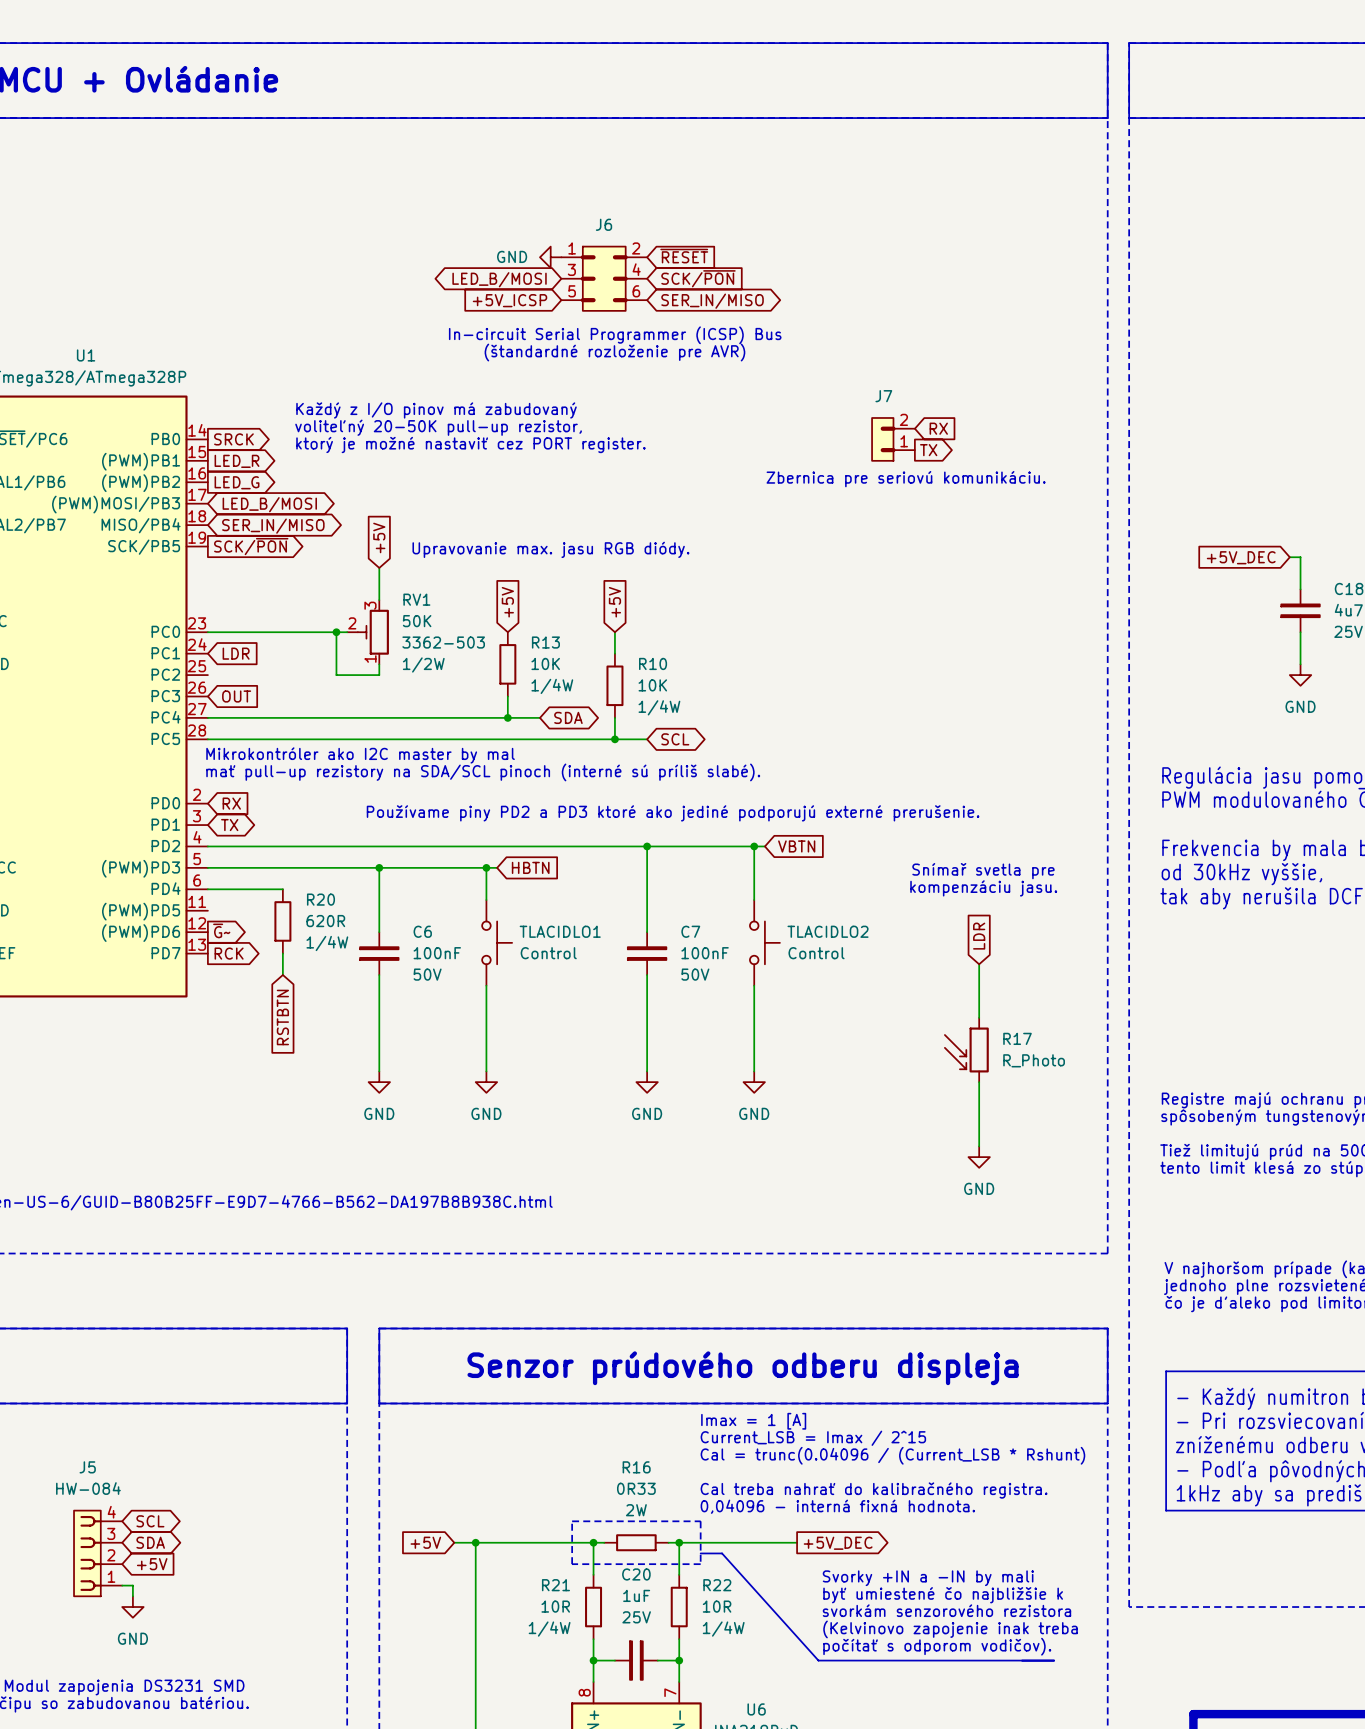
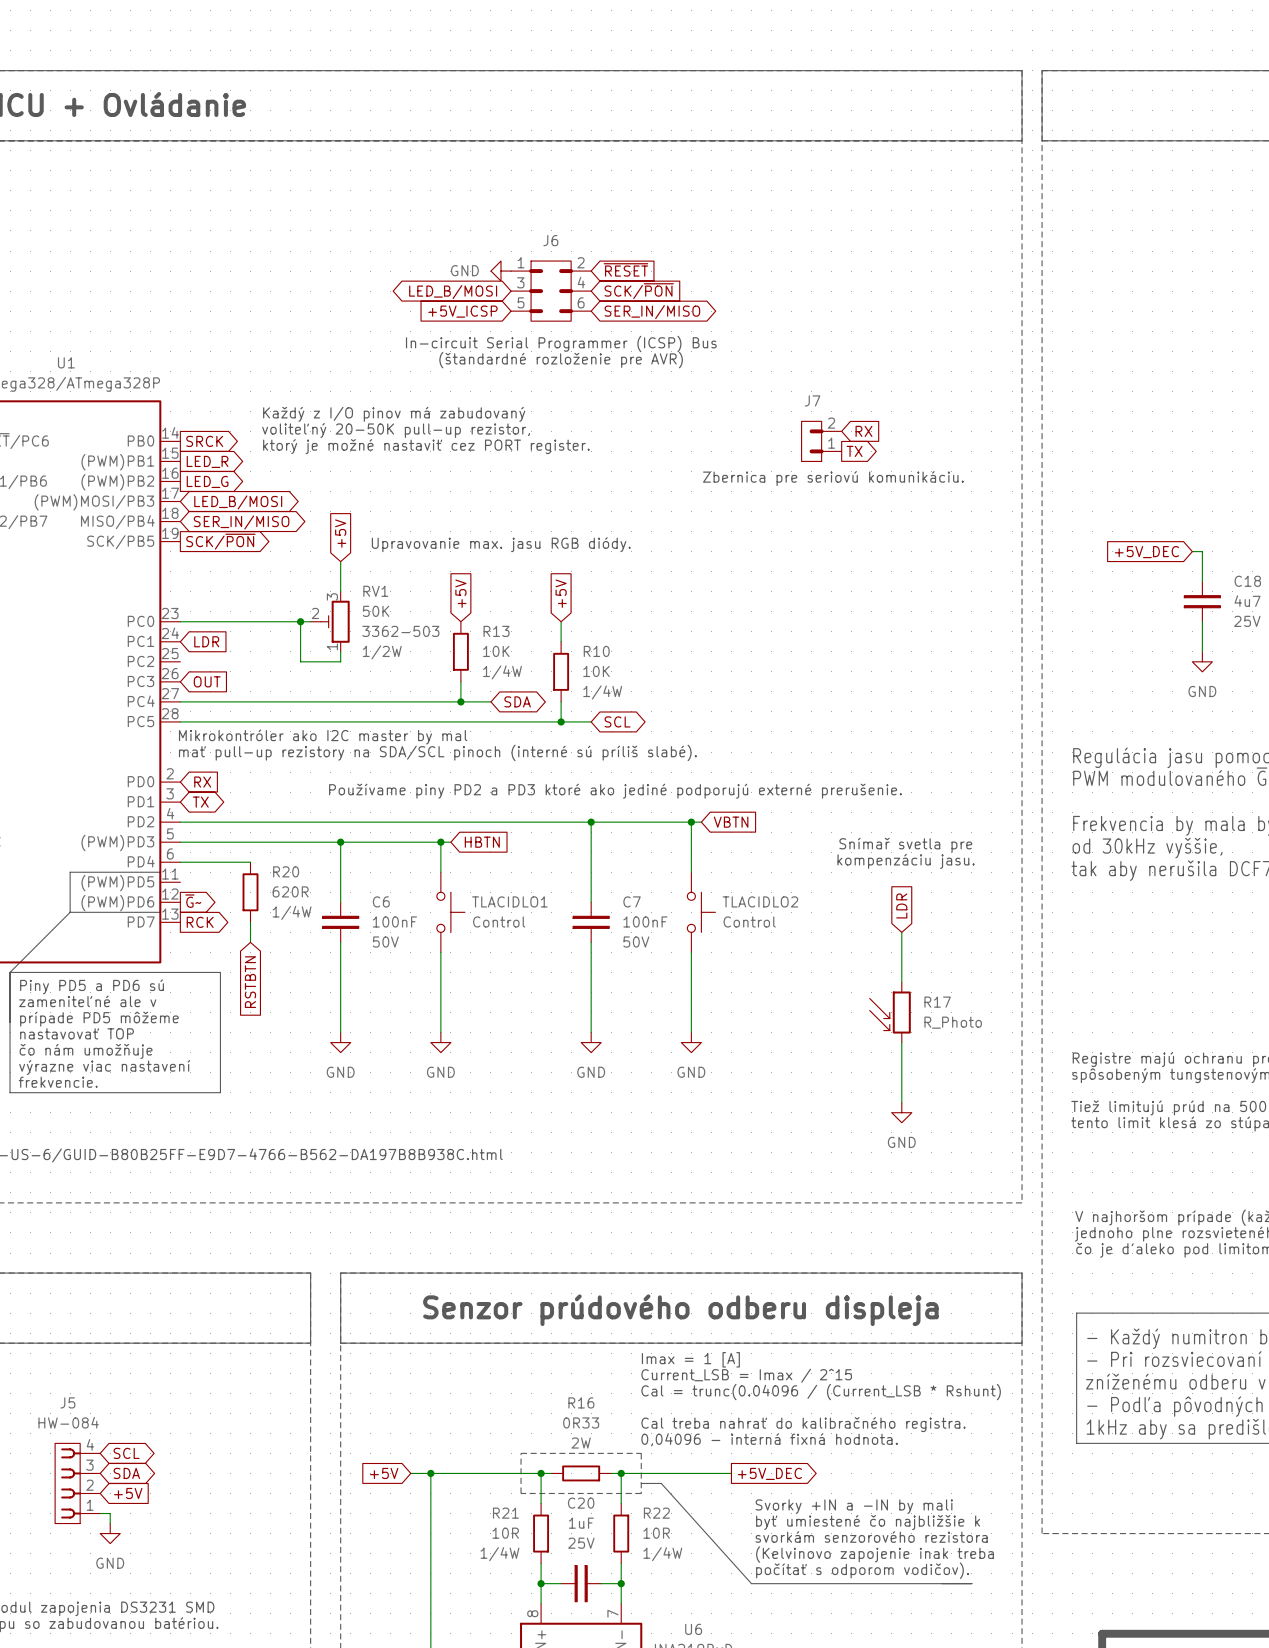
line: none -> (70, 912) (160, 912) (160, 872) (70, 872) (70, 912)
line: none -> (70, 912) (10, 972)
line: none -> (10, 972) (220, 972) (220, 1092) (10, 1092) (10, 972)
text: none -> Piny PD5 a PD6 sú (92, 986)
text: none -> zameniteľné ale v (87, 1001)
text: none -> prípade PD5 môžeme (99, 1019)
text: none -> nastavovať TOP (77, 1033)
text: none -> čo nám umožňuje (86, 1051)
text: none -> výrazne viac nastavení (104, 1067)
text: none -> frekvencie. (58, 1082)

